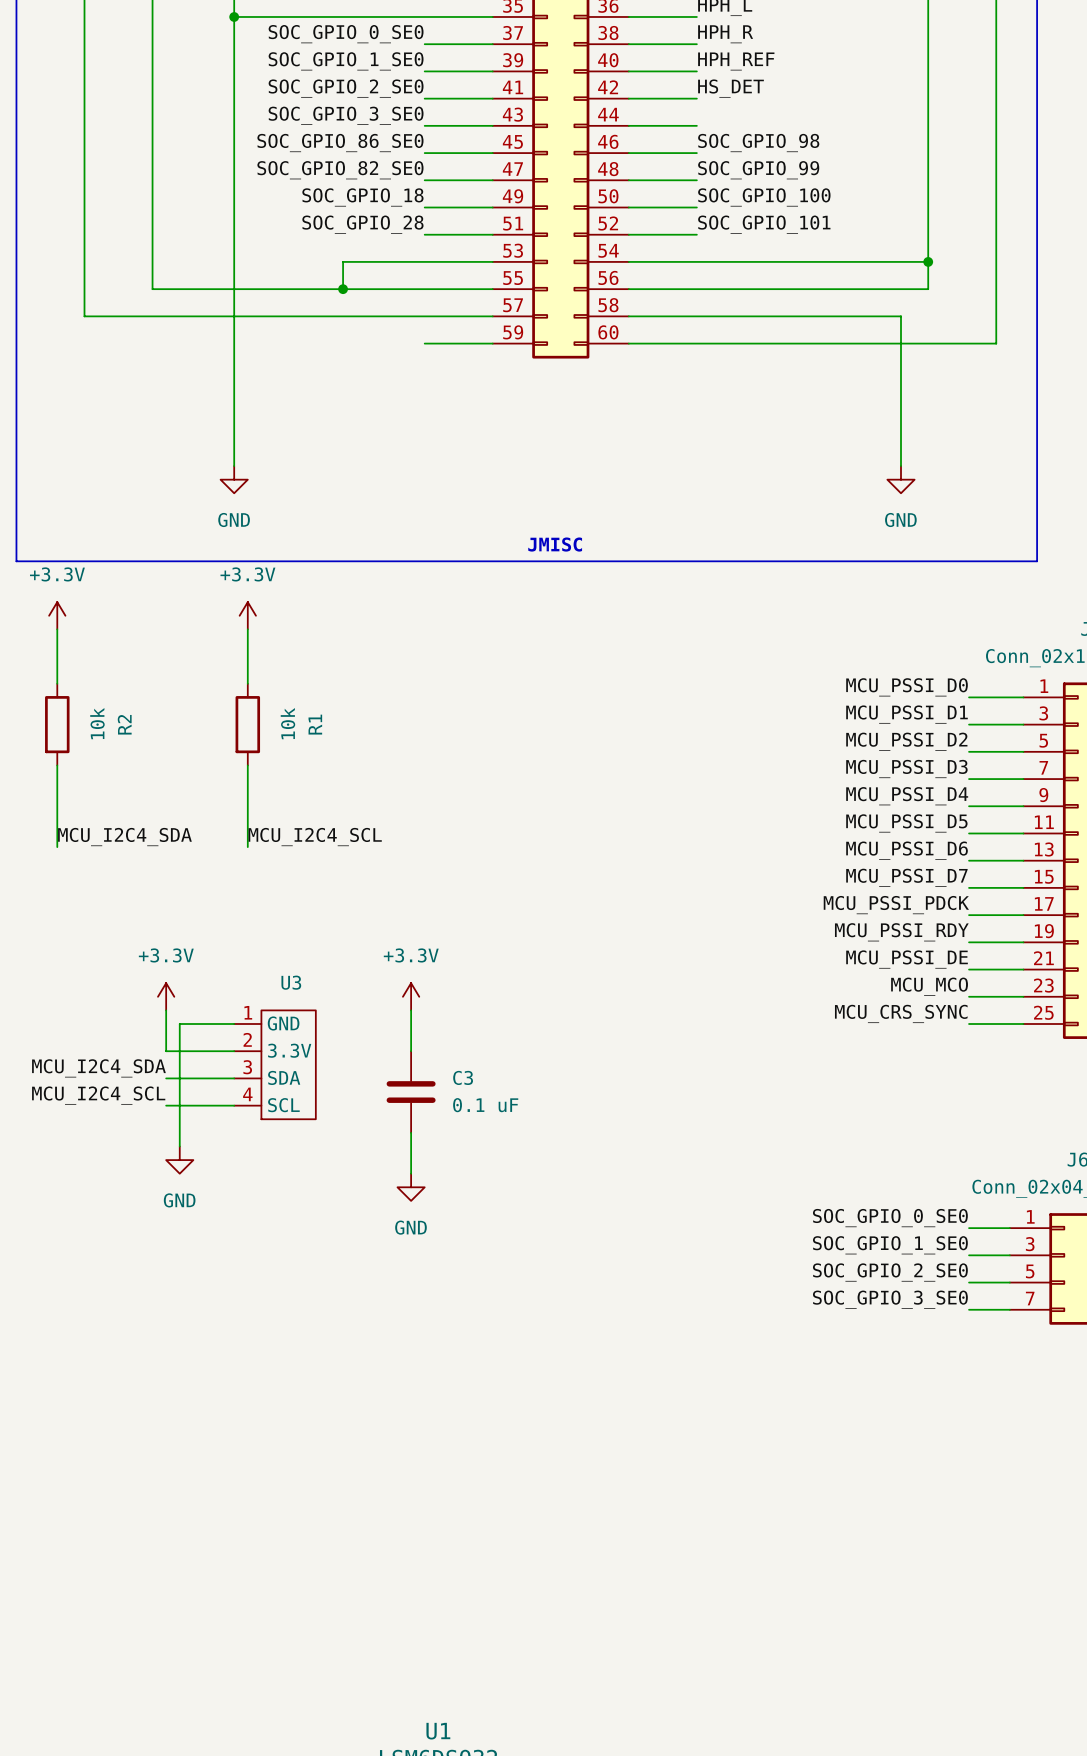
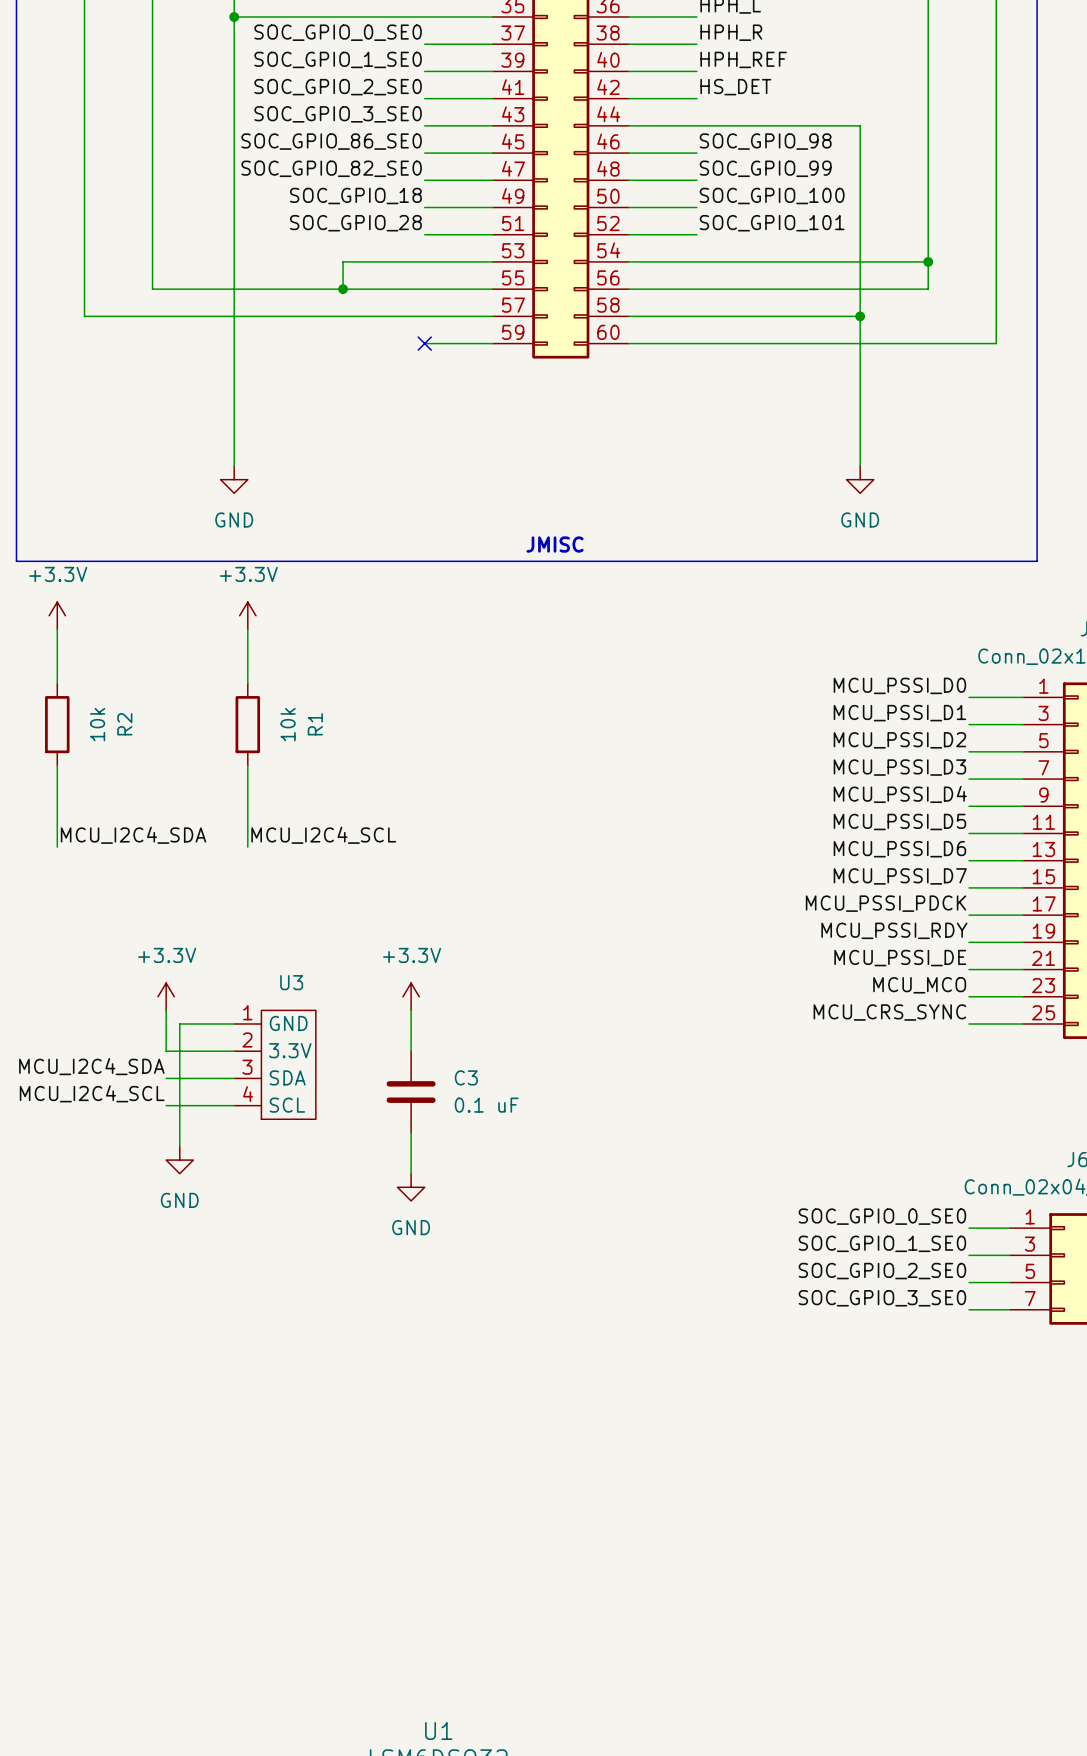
wire: none -> (696, 125) (860, 125) (860, 466)
wire: (860, 316) (900, 316) (900, 466) -> none
junction: none -> (860, 316)
no-connect mark: none -> (424, 343)
power symbol position: GND (900, 479) -> GND (860, 479)

